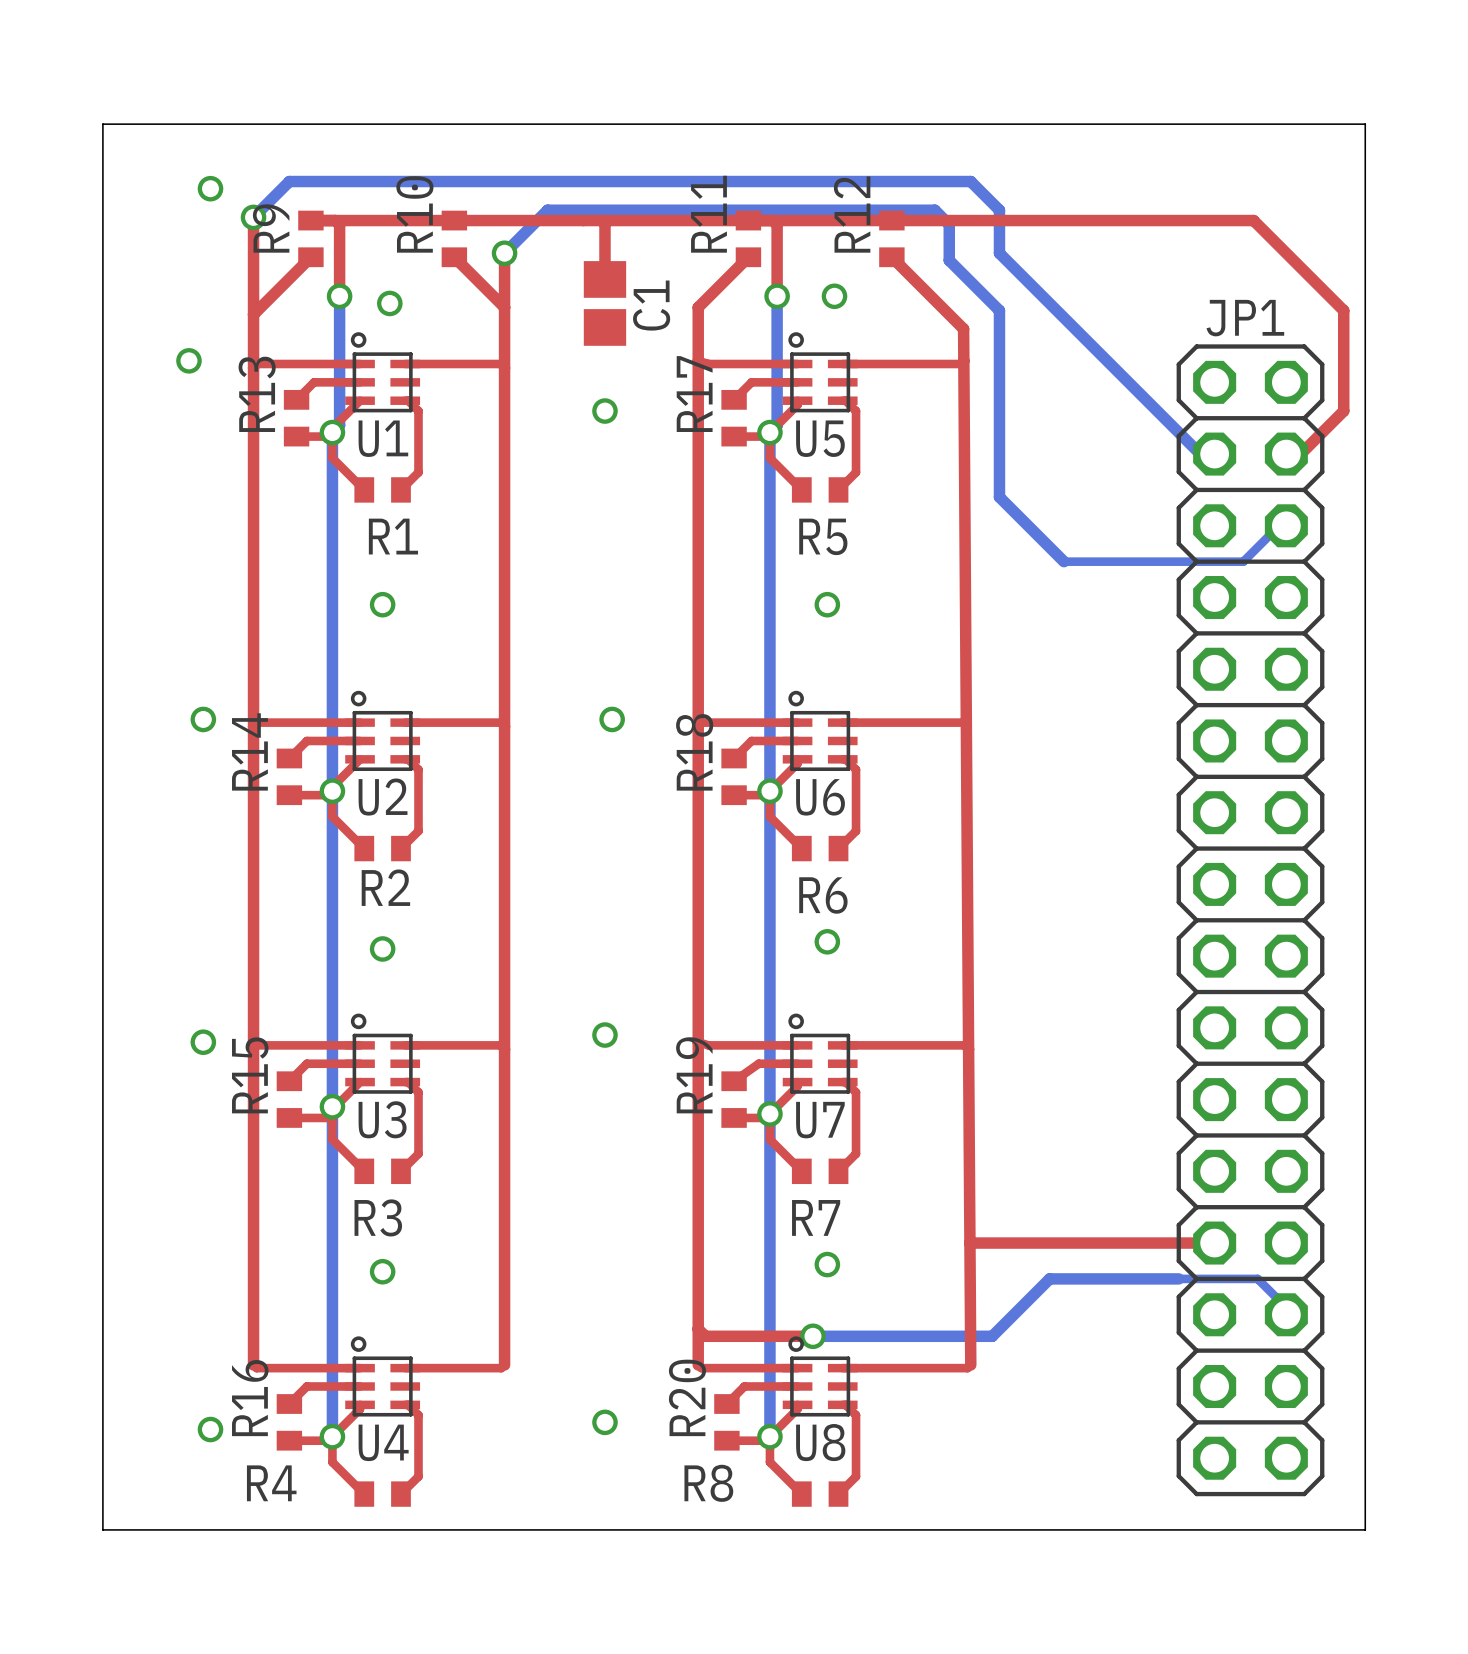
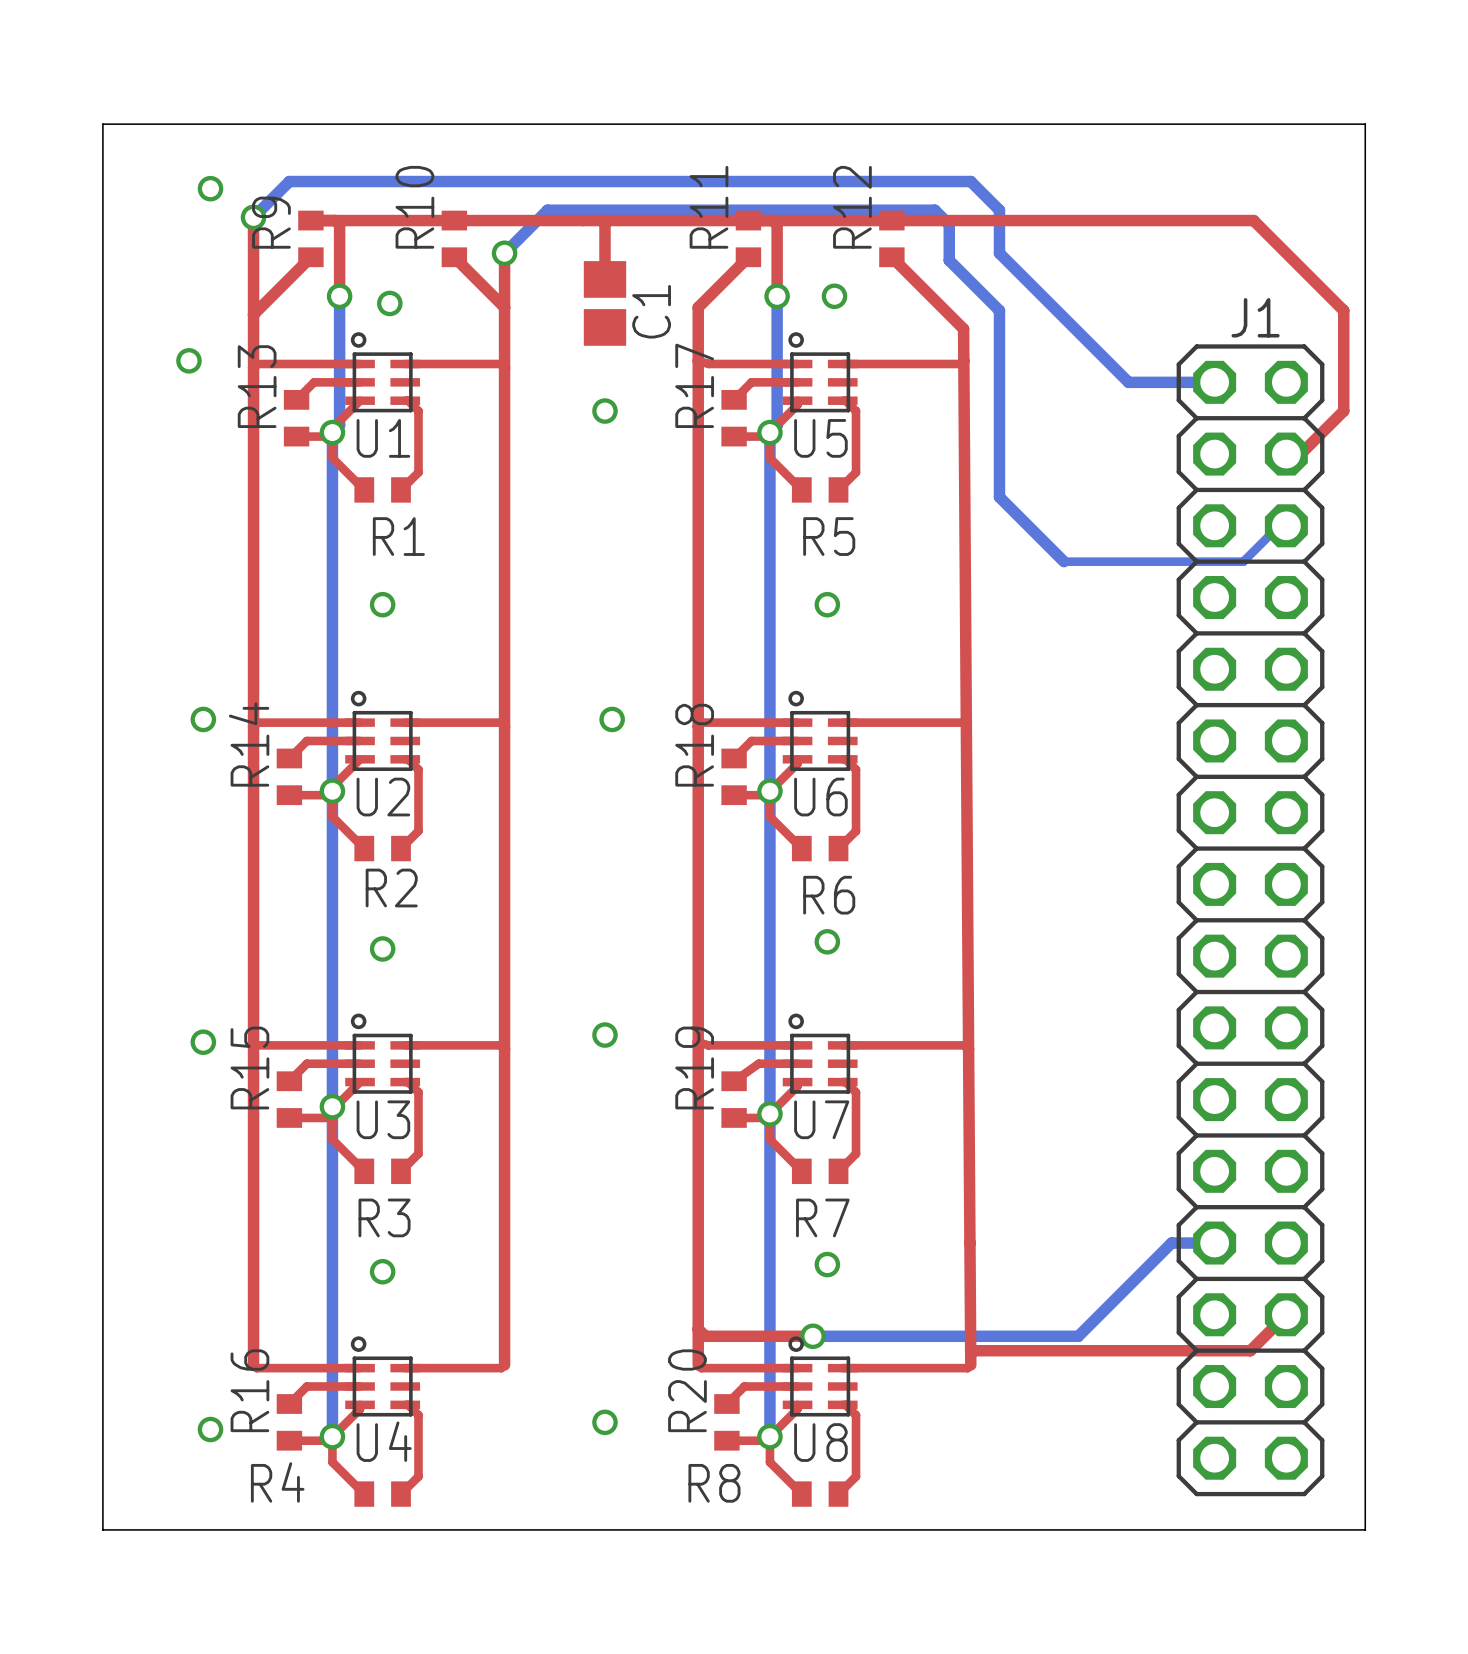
JP1 name: JP1 (1245, 318) -> J1 (1255, 317)
bottom track: (1128, 382) (1200, 454) (1214, 454) -> (1128, 382) (1214, 382)
top track: (969, 1243) (1214, 1243) -> none
top track: none -> (1286, 1314) (1250, 1350) (970, 1350)
bottom track: (1286, 1314) (1286, 1307) (1257, 1278) (1049, 1278) (992, 1336) -> (1214, 1243) (1171, 1243) (1078, 1336) (992, 1336)

